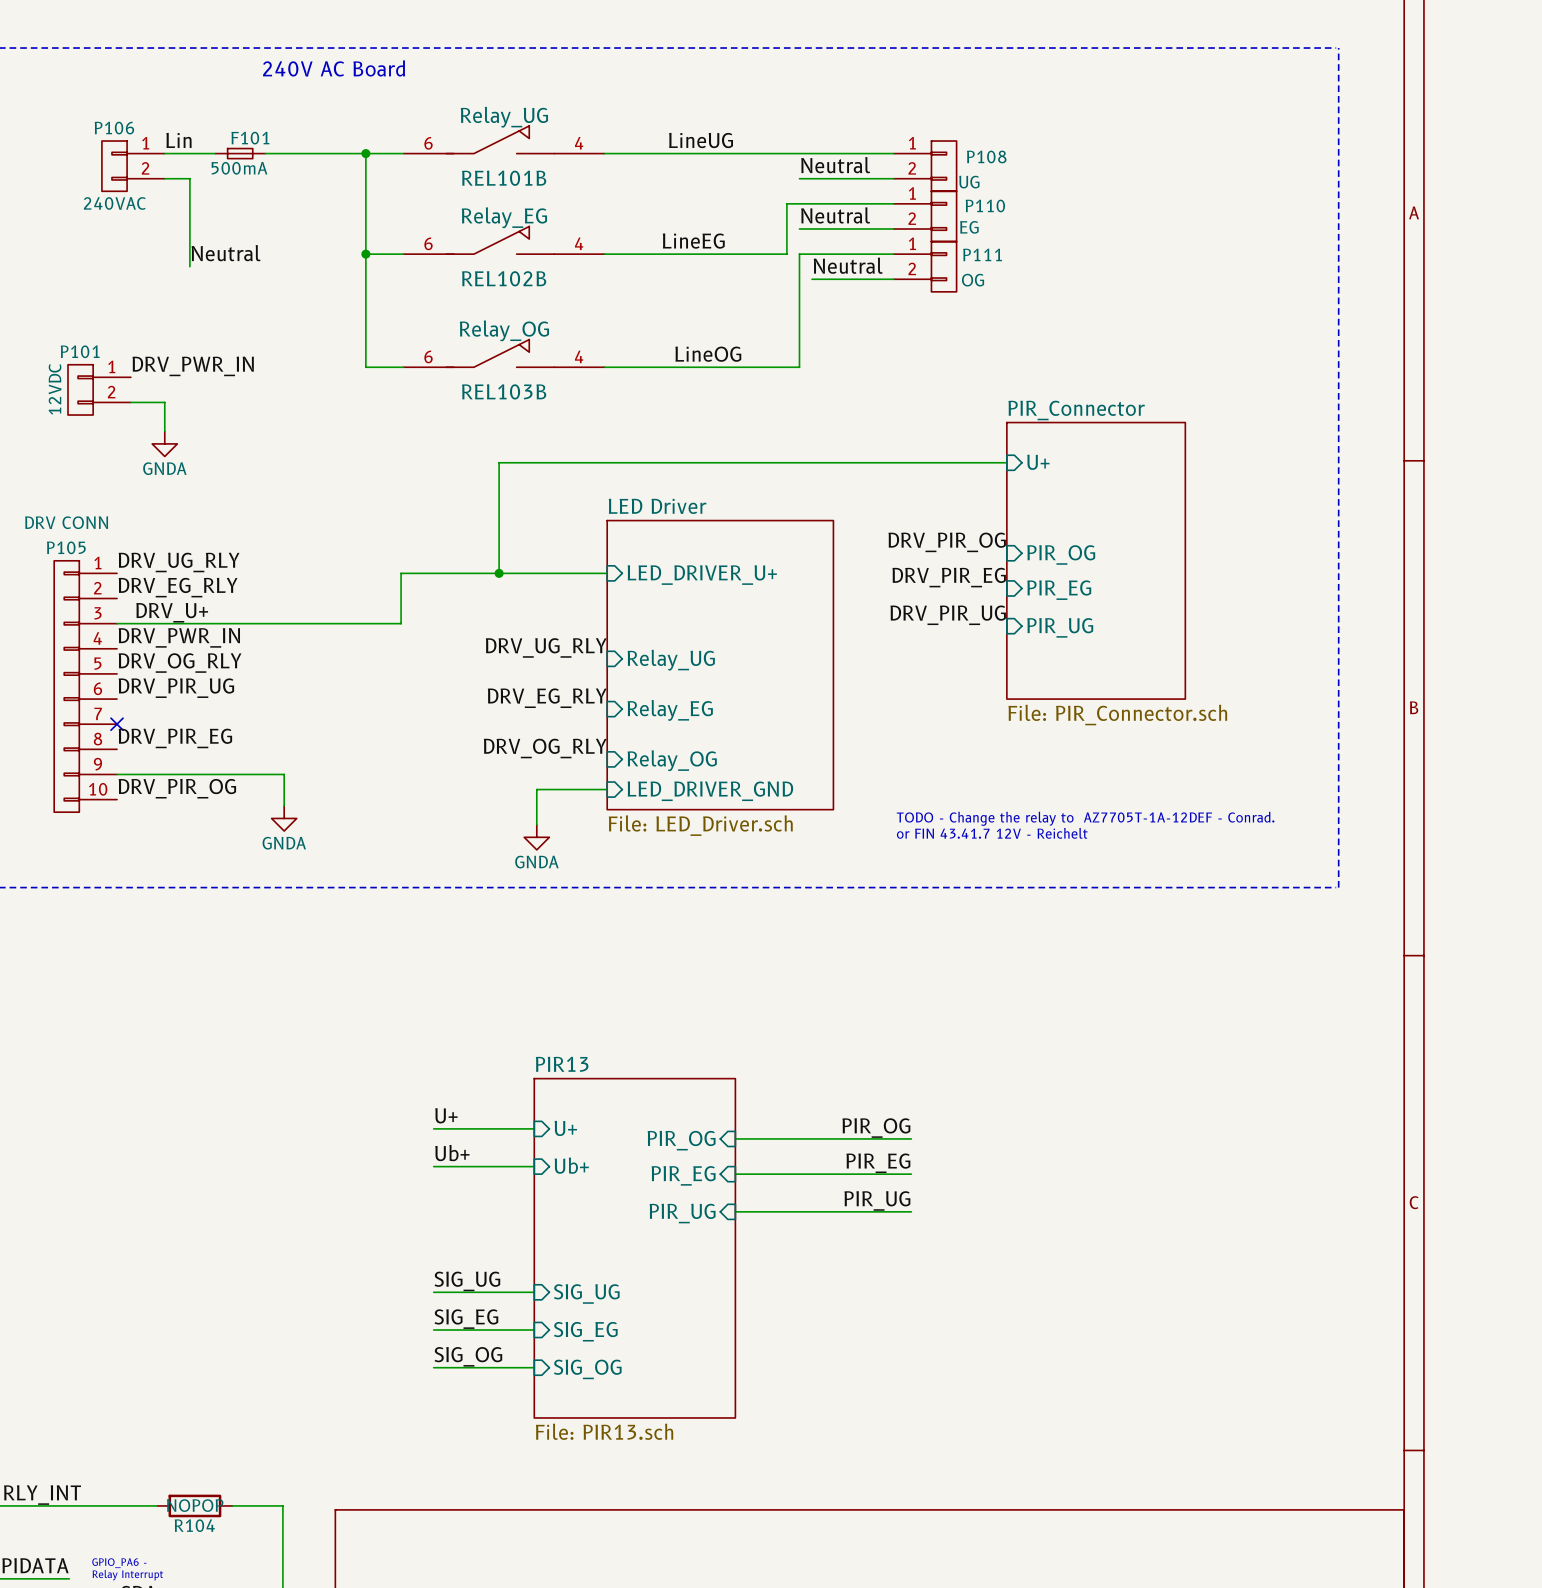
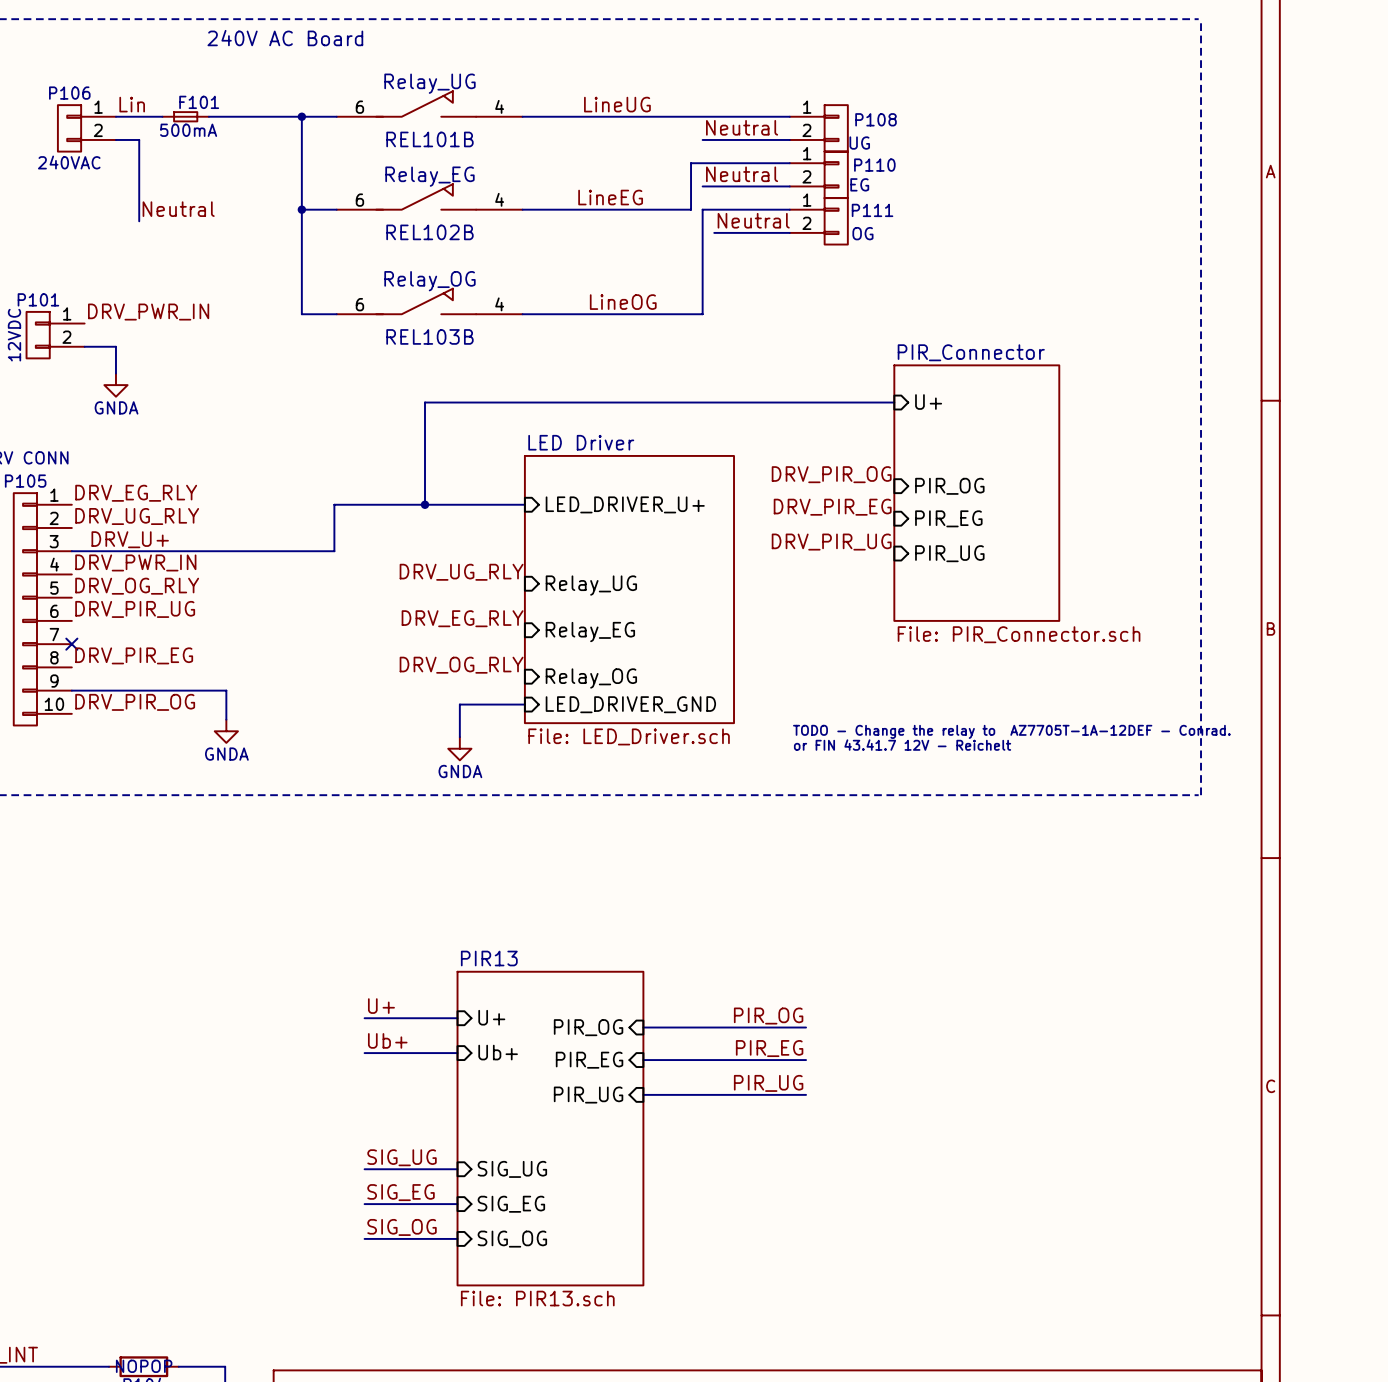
label: DRV_UG_RLY (179, 562) -> DRV_EG_RLY (136, 493)
label: DRV_EG_RLY (178, 587) -> DRV_UG_RLY (137, 516)

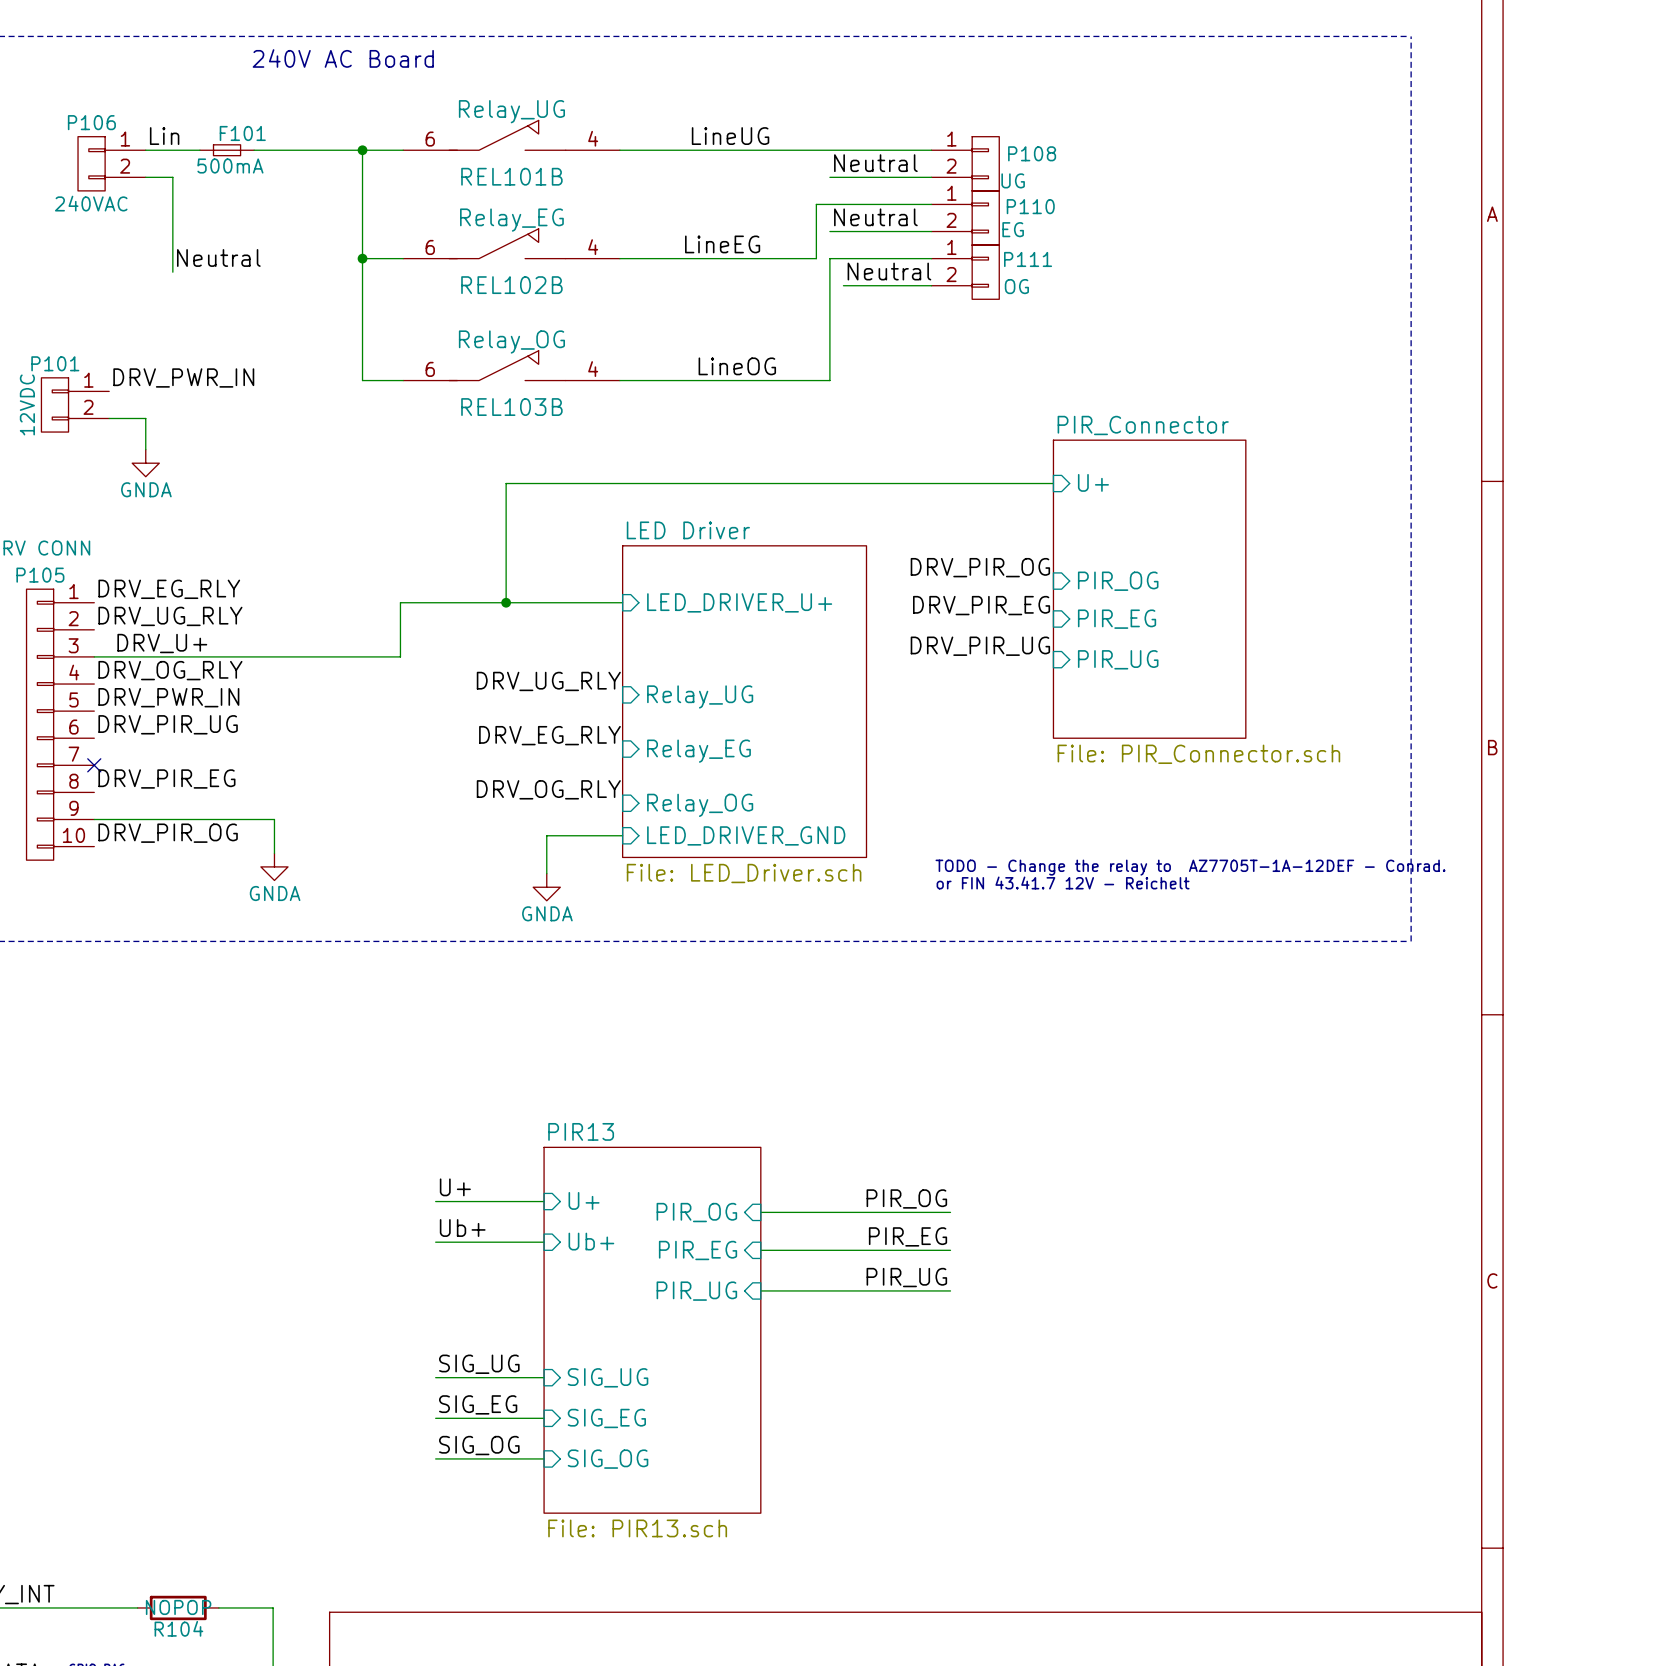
label: DRV_PWR_IN (135, 562) -> DRV_OG_RLY (170, 670)
label: DRV_OG_RLY (137, 586) -> DRV_PWR_IN (168, 697)

